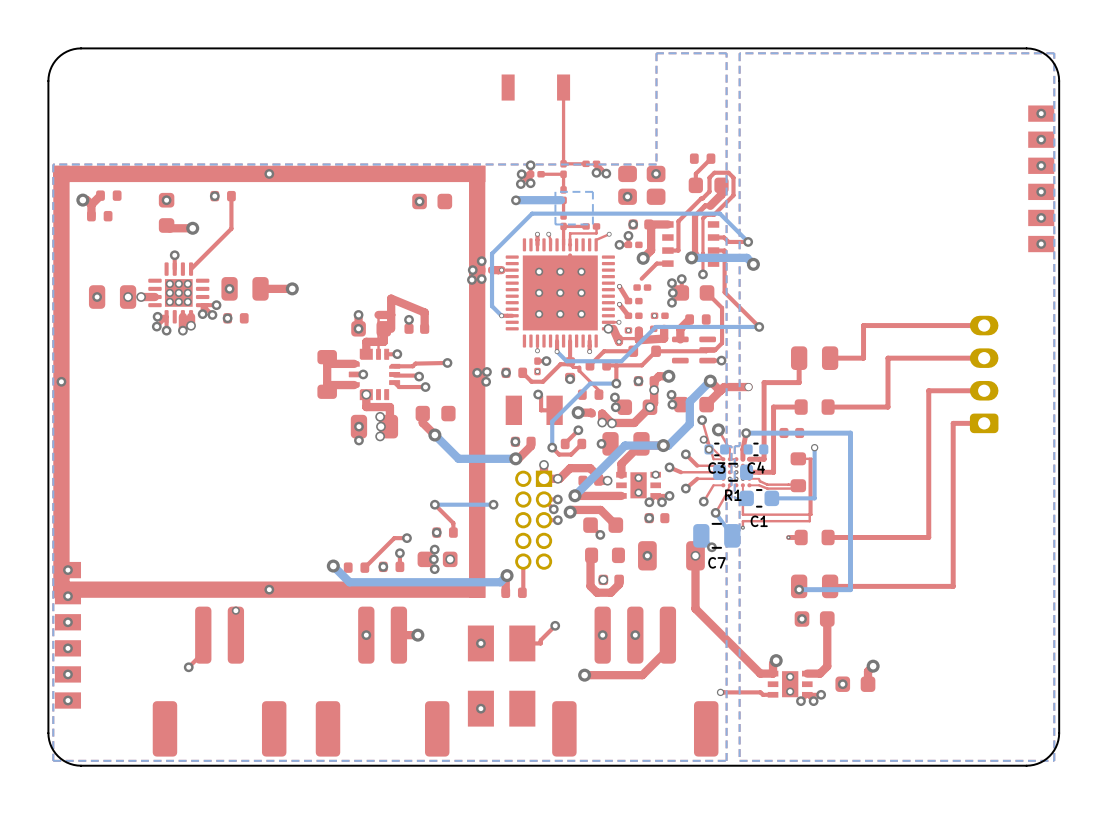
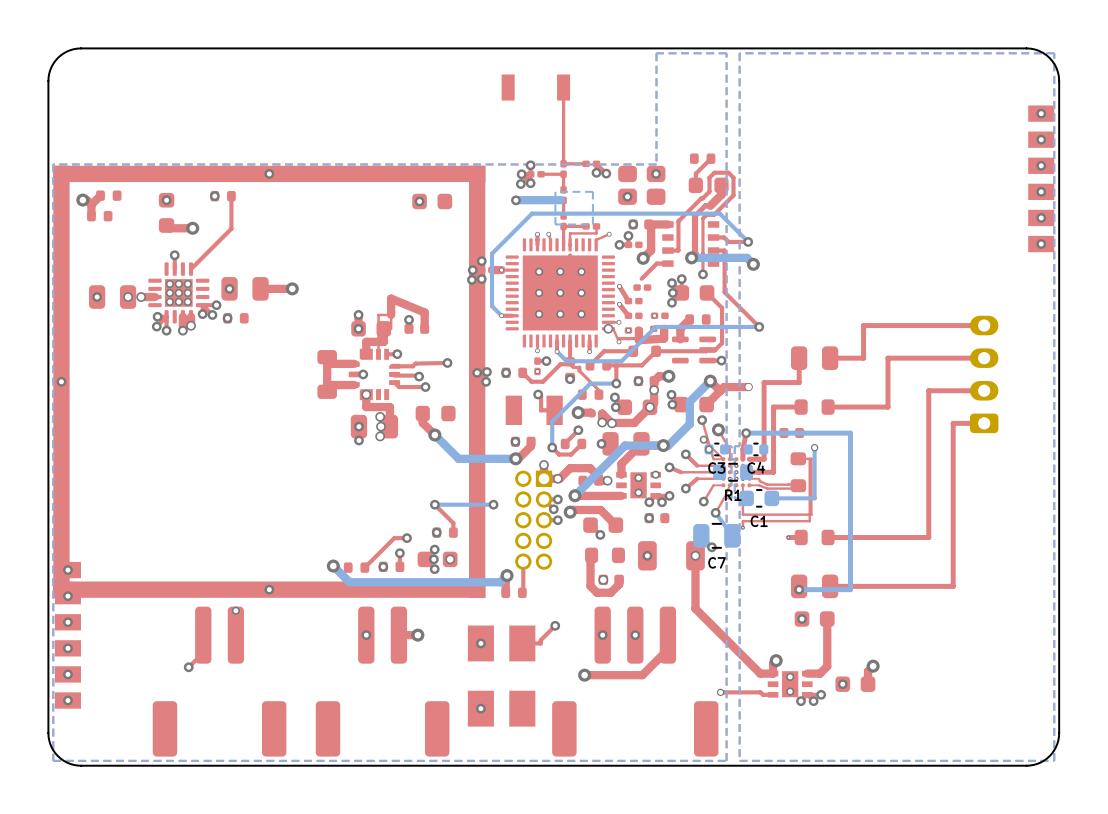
top track width: thick (378, 314) (391, 314) (391, 328) -> thin (378, 314) (391, 314) (391, 328)
top track width: thick (613, 328) (619, 341) (619, 338) -> thin (613, 328) (619, 341) (619, 338)

